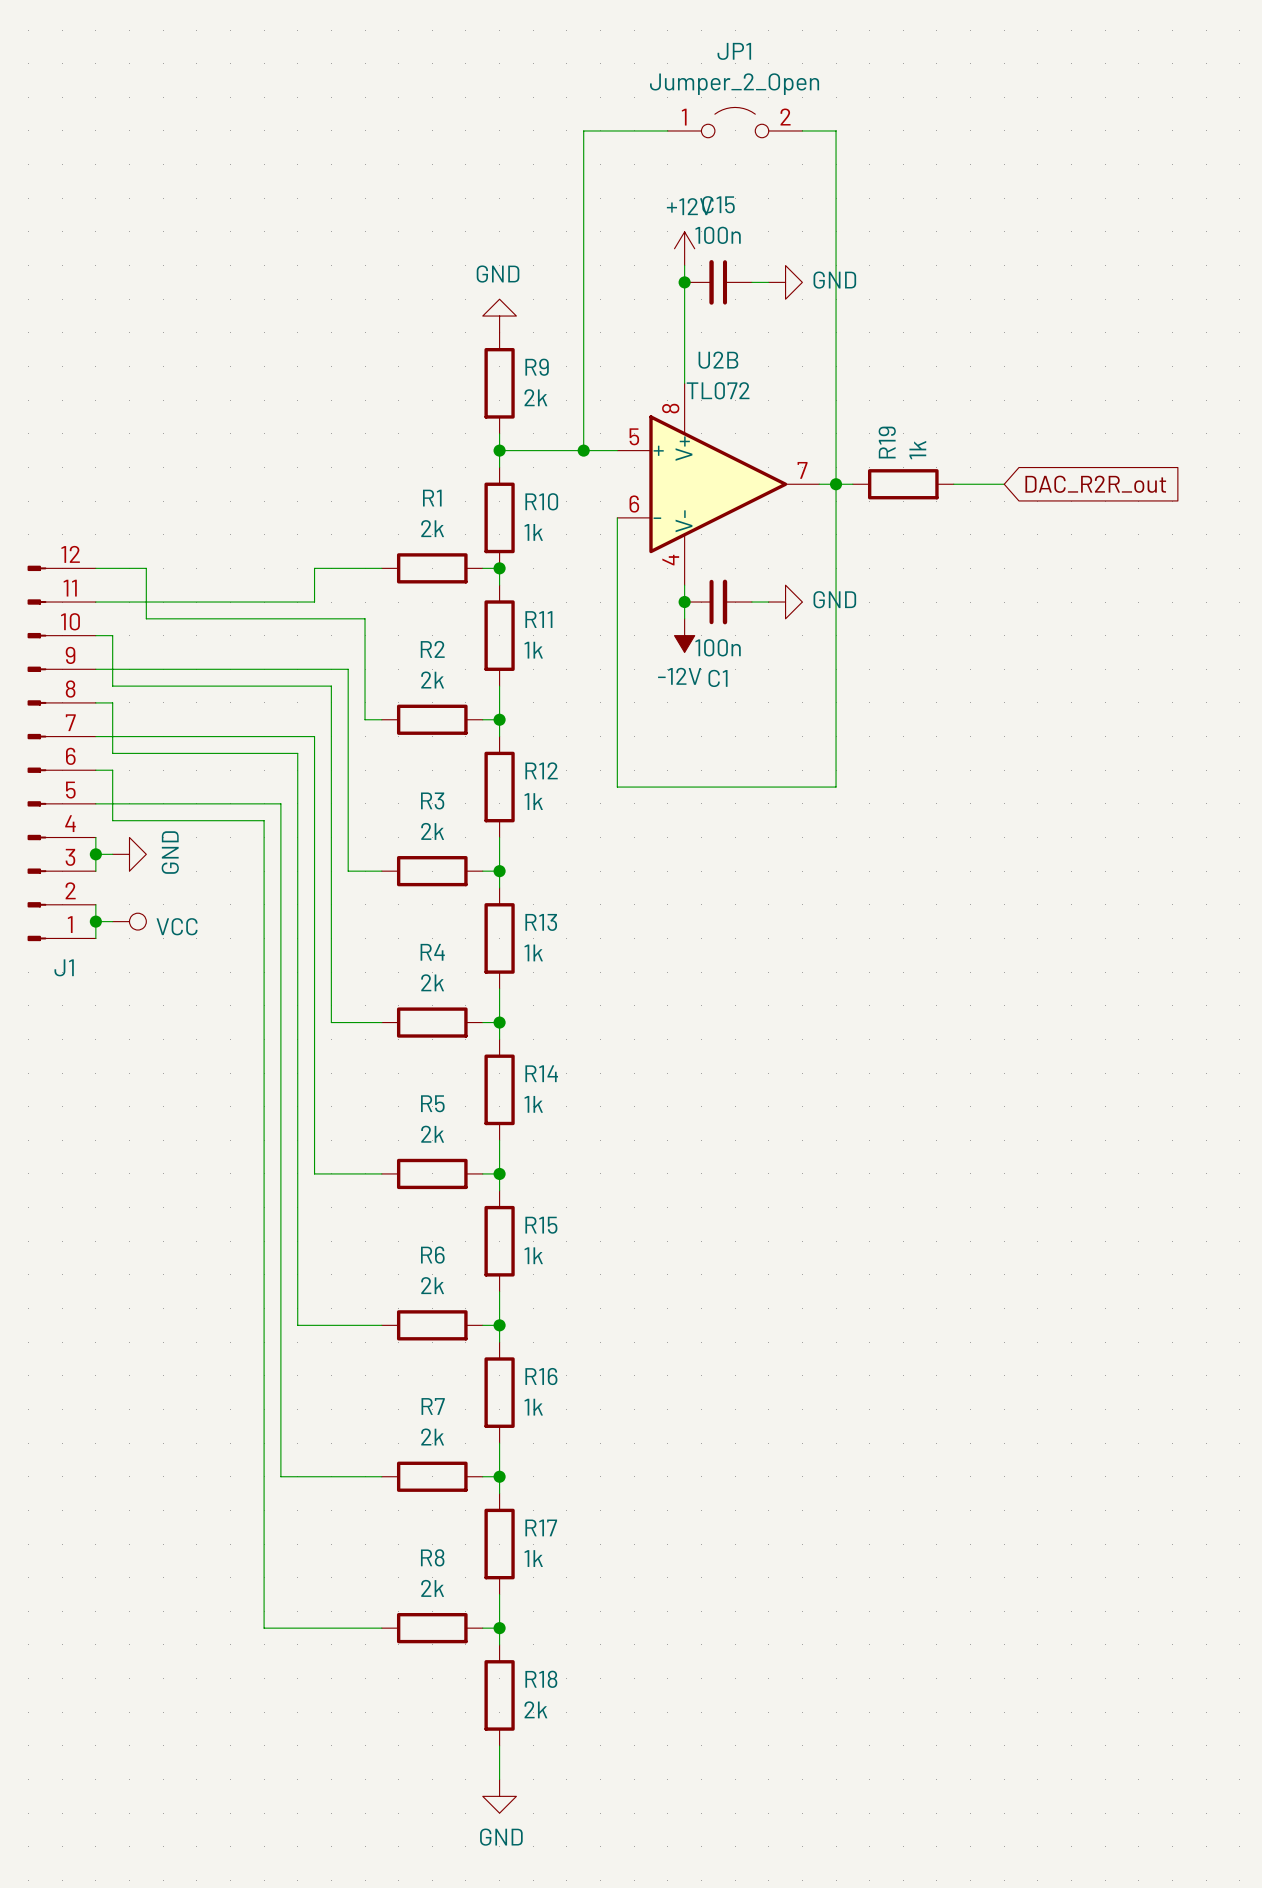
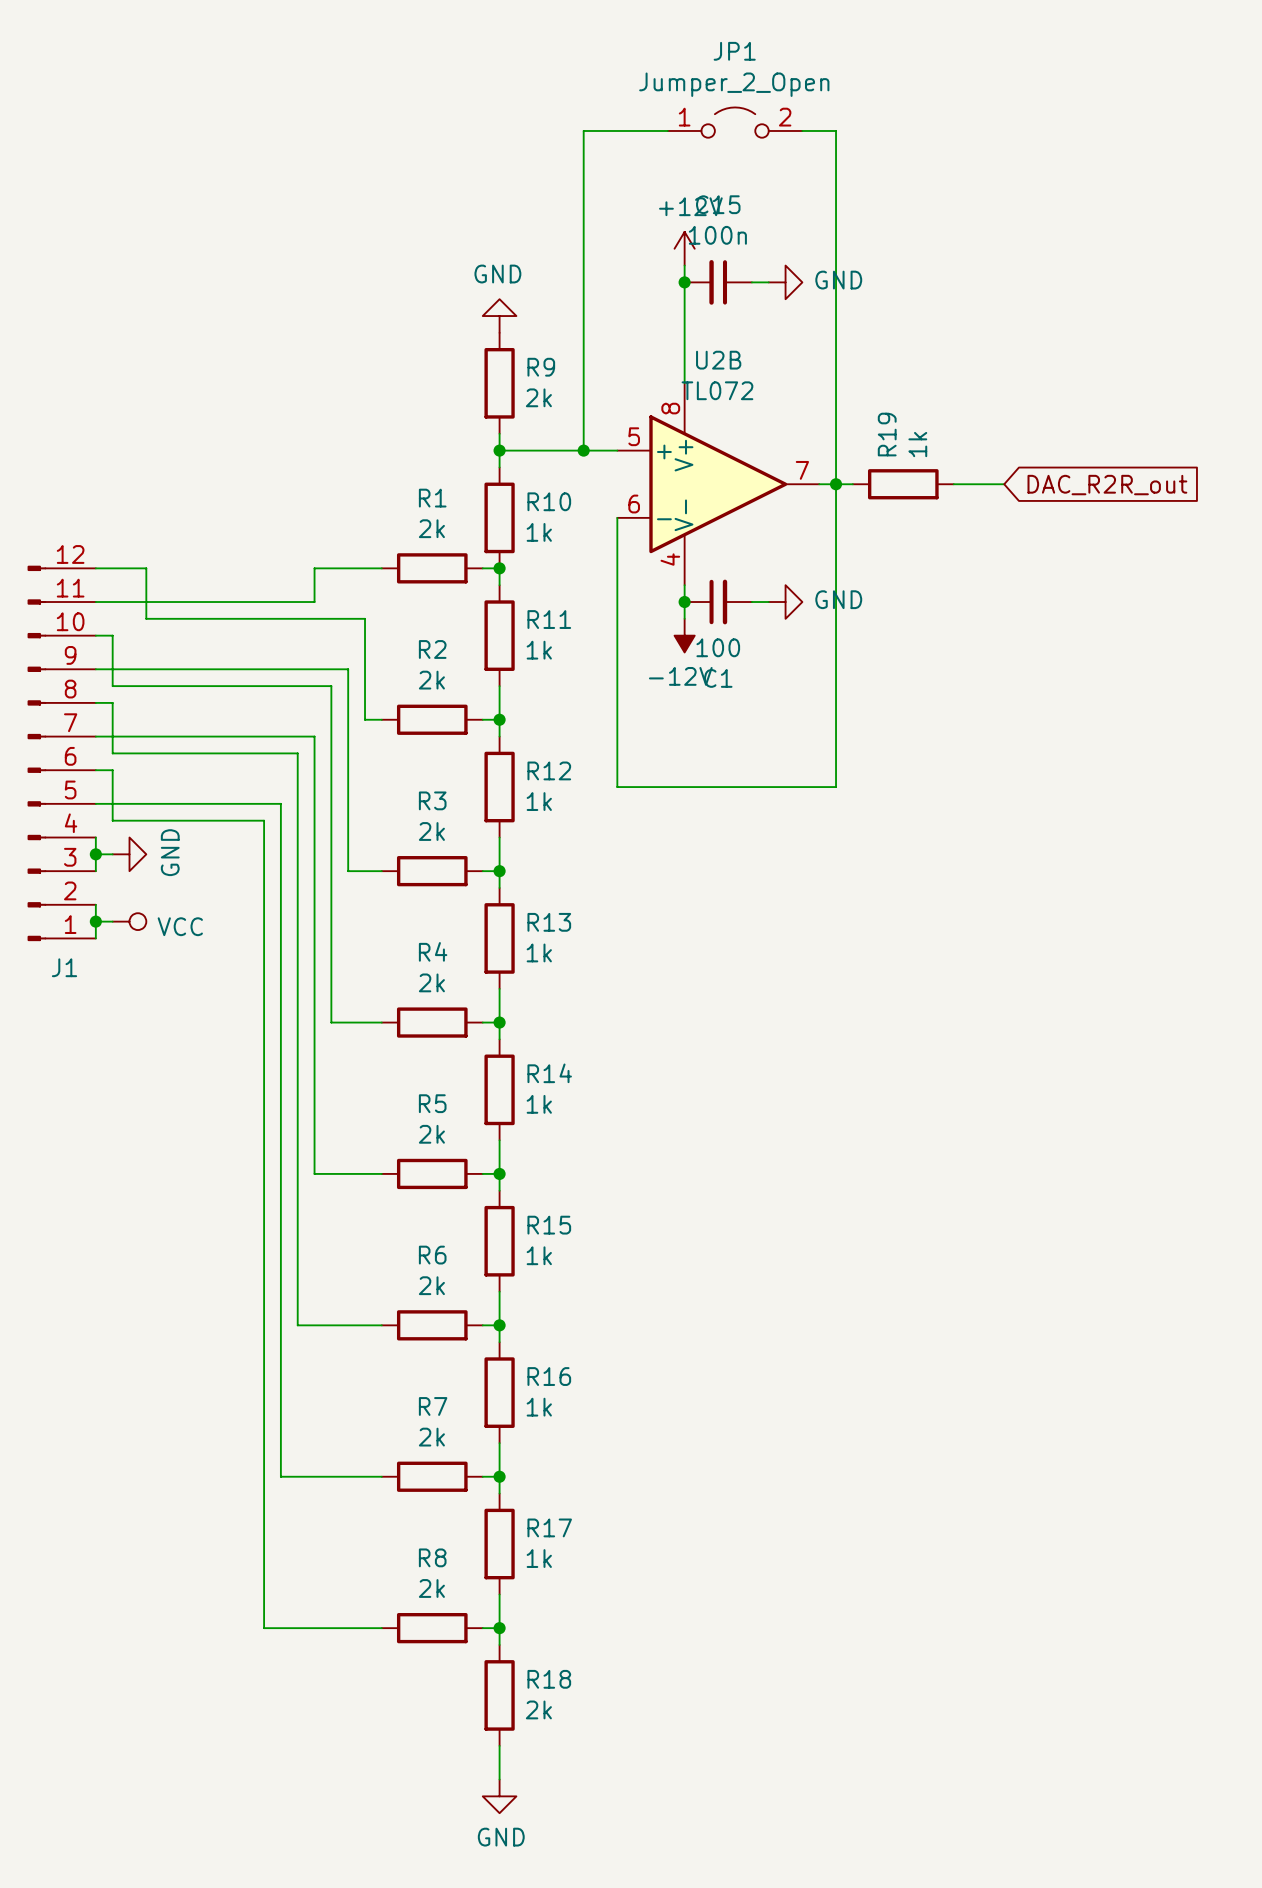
C1 value: 100n (718, 647) -> 100 (718, 647)

